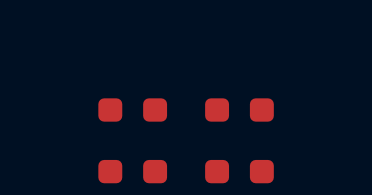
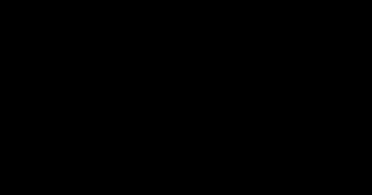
part: (132, 110) -> none
part: (239, 110) -> none
part: (132, 171) -> none
part: (239, 171) -> none

